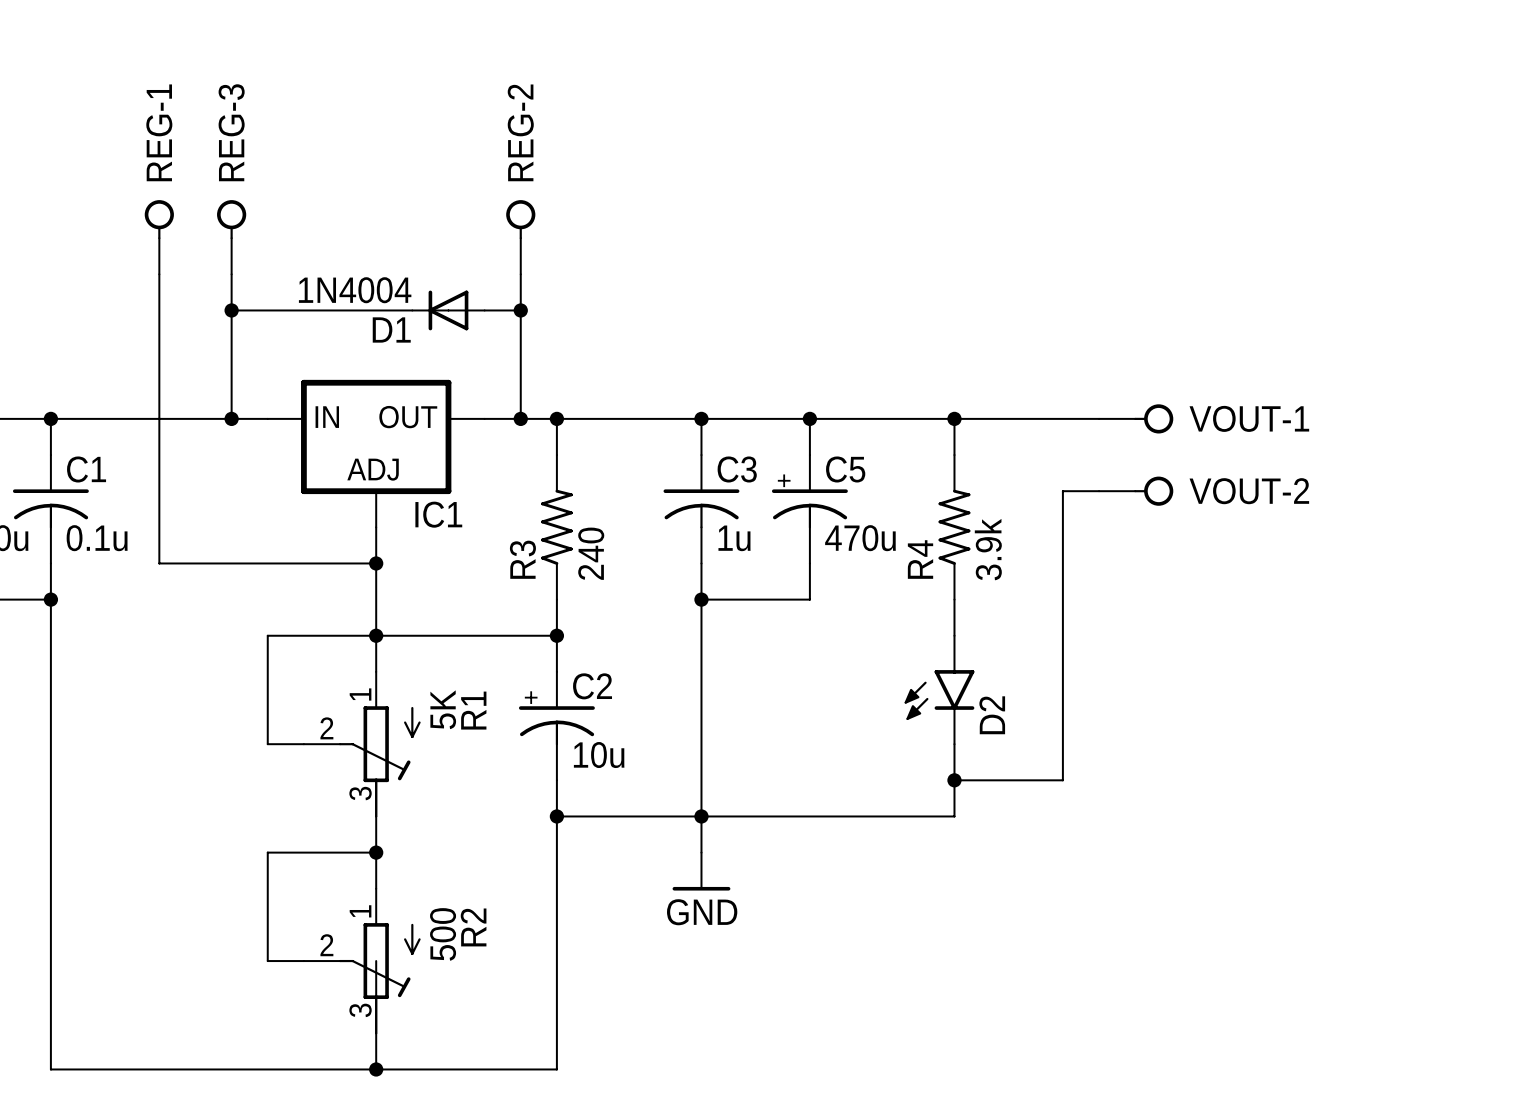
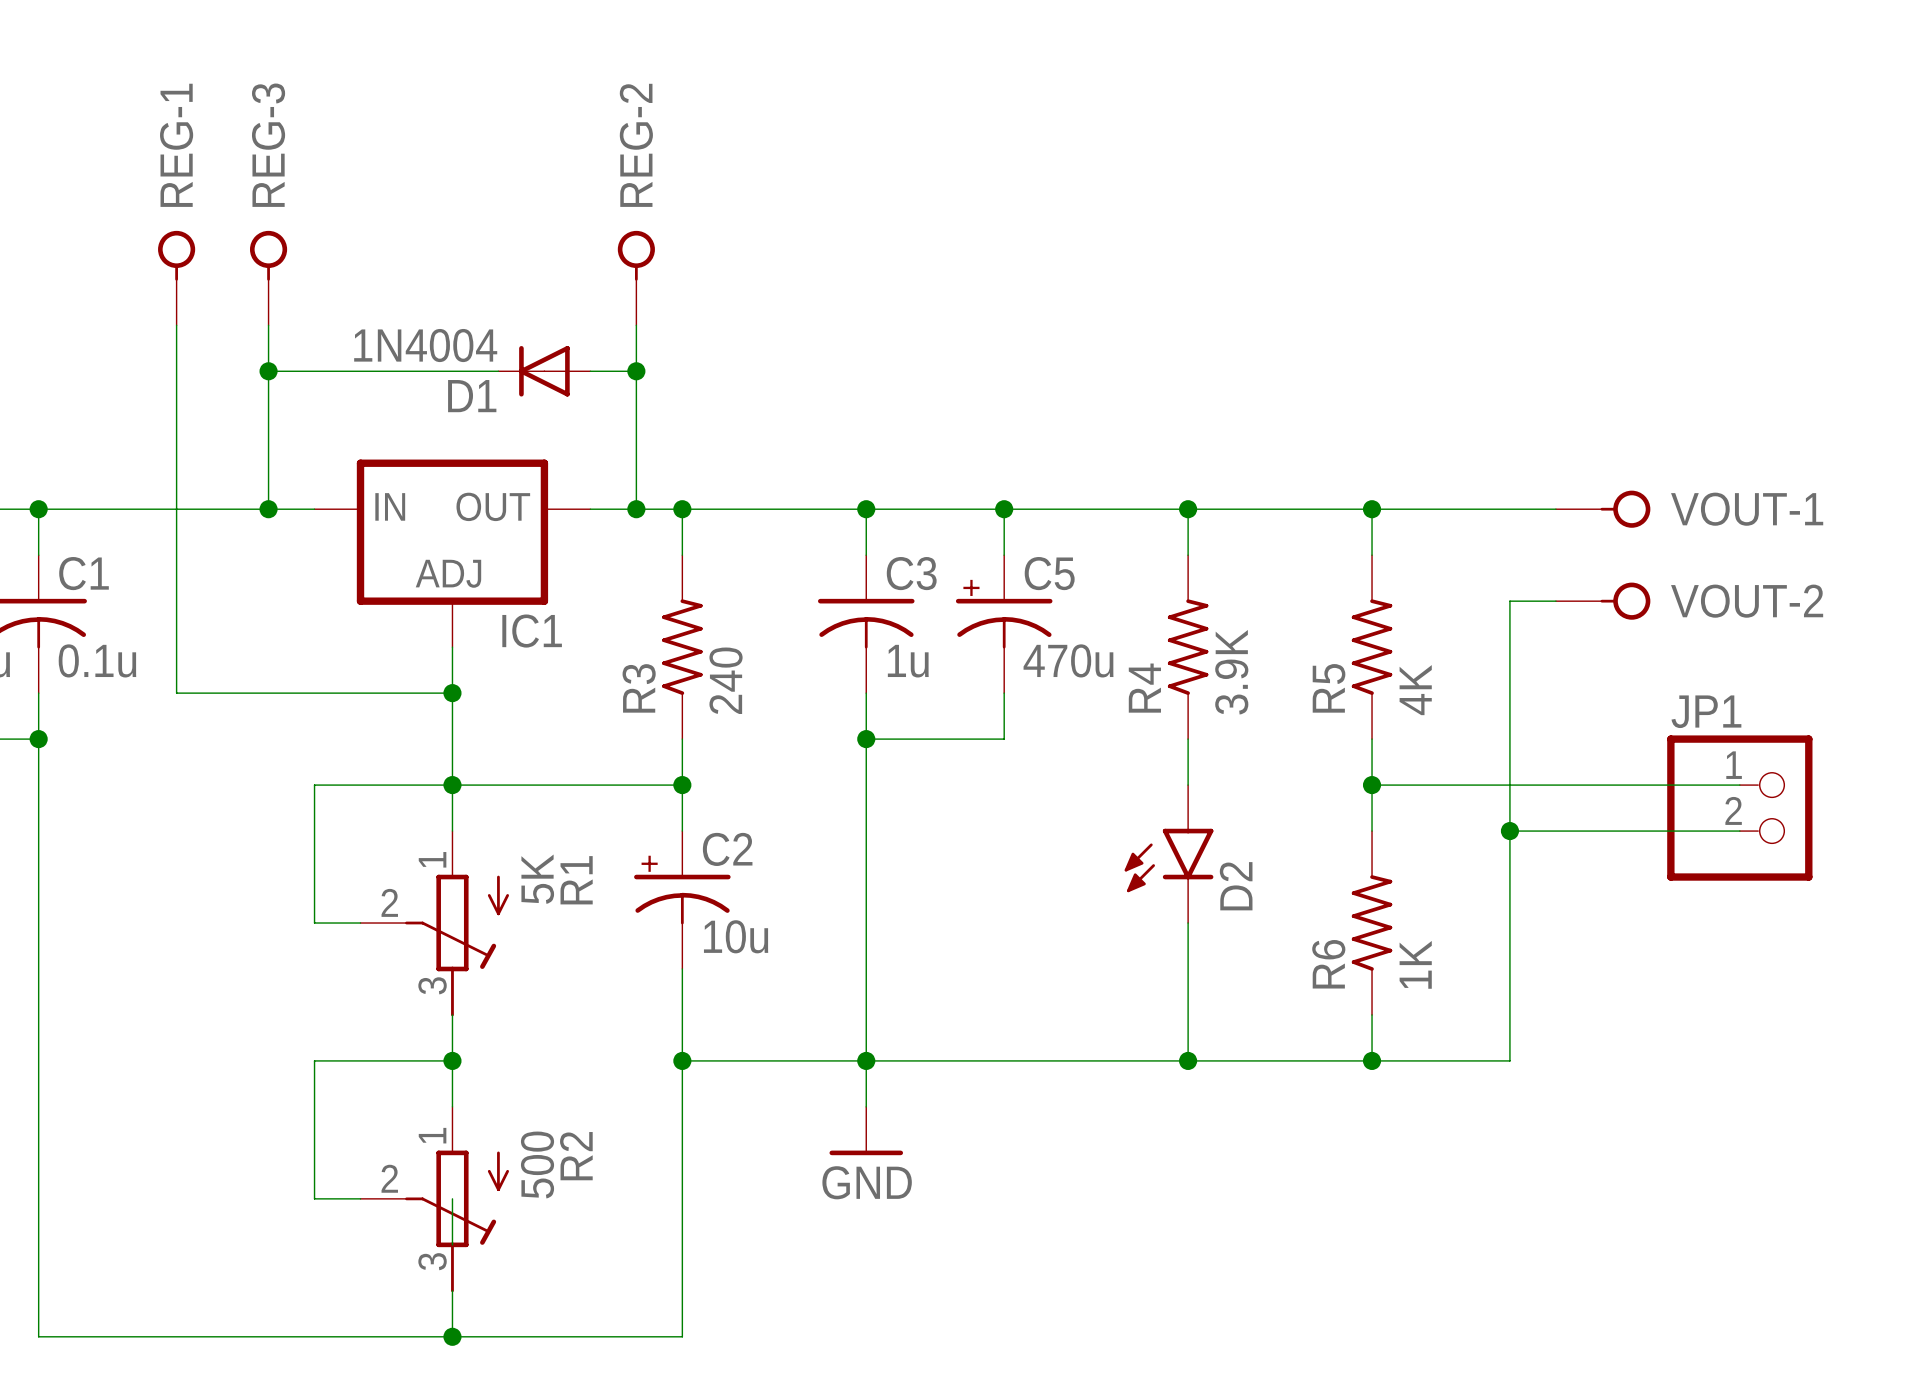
junction: none -> (1372, 509)
VOUT-1 position: (1136, 418) -> (1603, 509)
wire: none -> (1555, 509) (1372, 509) (1372, 555)
wire: (1099, 491) (1062, 491) (1062, 780) (954, 780) -> none
VOUT-2 position: (1136, 491) -> (1603, 601)
wire: none -> (1555, 601) (1509, 601) (1509, 1060) (682, 1060)
R5: none -> 4K (1372, 647)
R4 value: 3.9k (988, 549) -> 3.9K (1231, 672)
wire: none -> (1372, 739) (1372, 831)
wire: none -> (1372, 785) (1739, 785)
junction: none -> (1372, 785)
JP1: none -> (1739, 808)
wire: none -> (1509, 831) (1739, 831)
junction: none -> (1509, 831)
R6: none -> 1K (1372, 923)
junction position: (954, 780) -> (1188, 1060)
wire: (556, 816) (954, 816) -> (1188, 1060) (1188, 1014)
junction position: (556, 816) -> (682, 1060)
junction position: (701, 816) -> (866, 1060)
wire: none -> (1372, 1014) (1372, 1060)
junction: none -> (1372, 1060)
power symbol position: GND (701, 871) -> GND (866, 1131)

